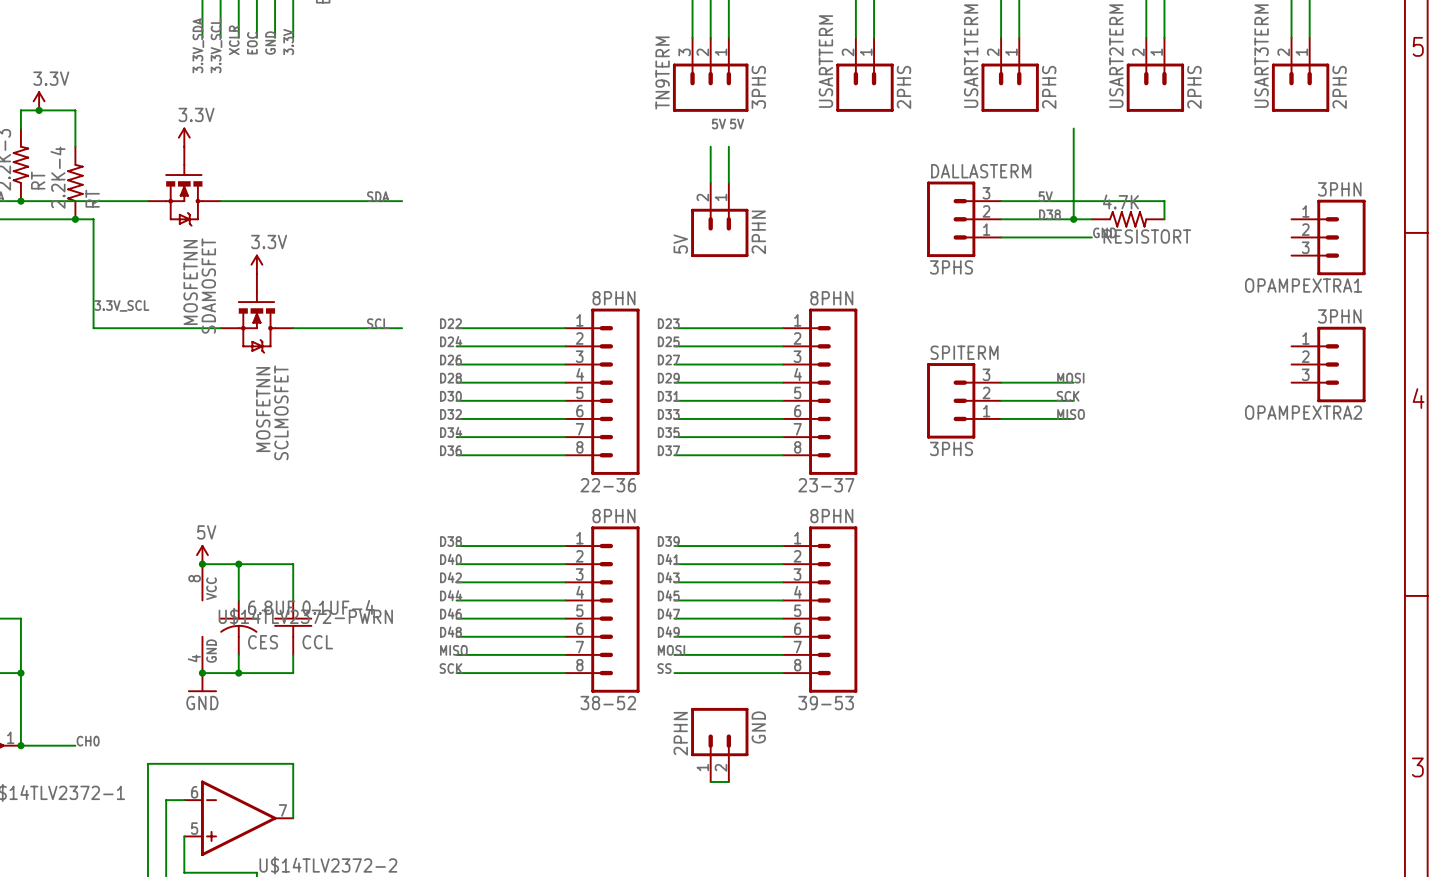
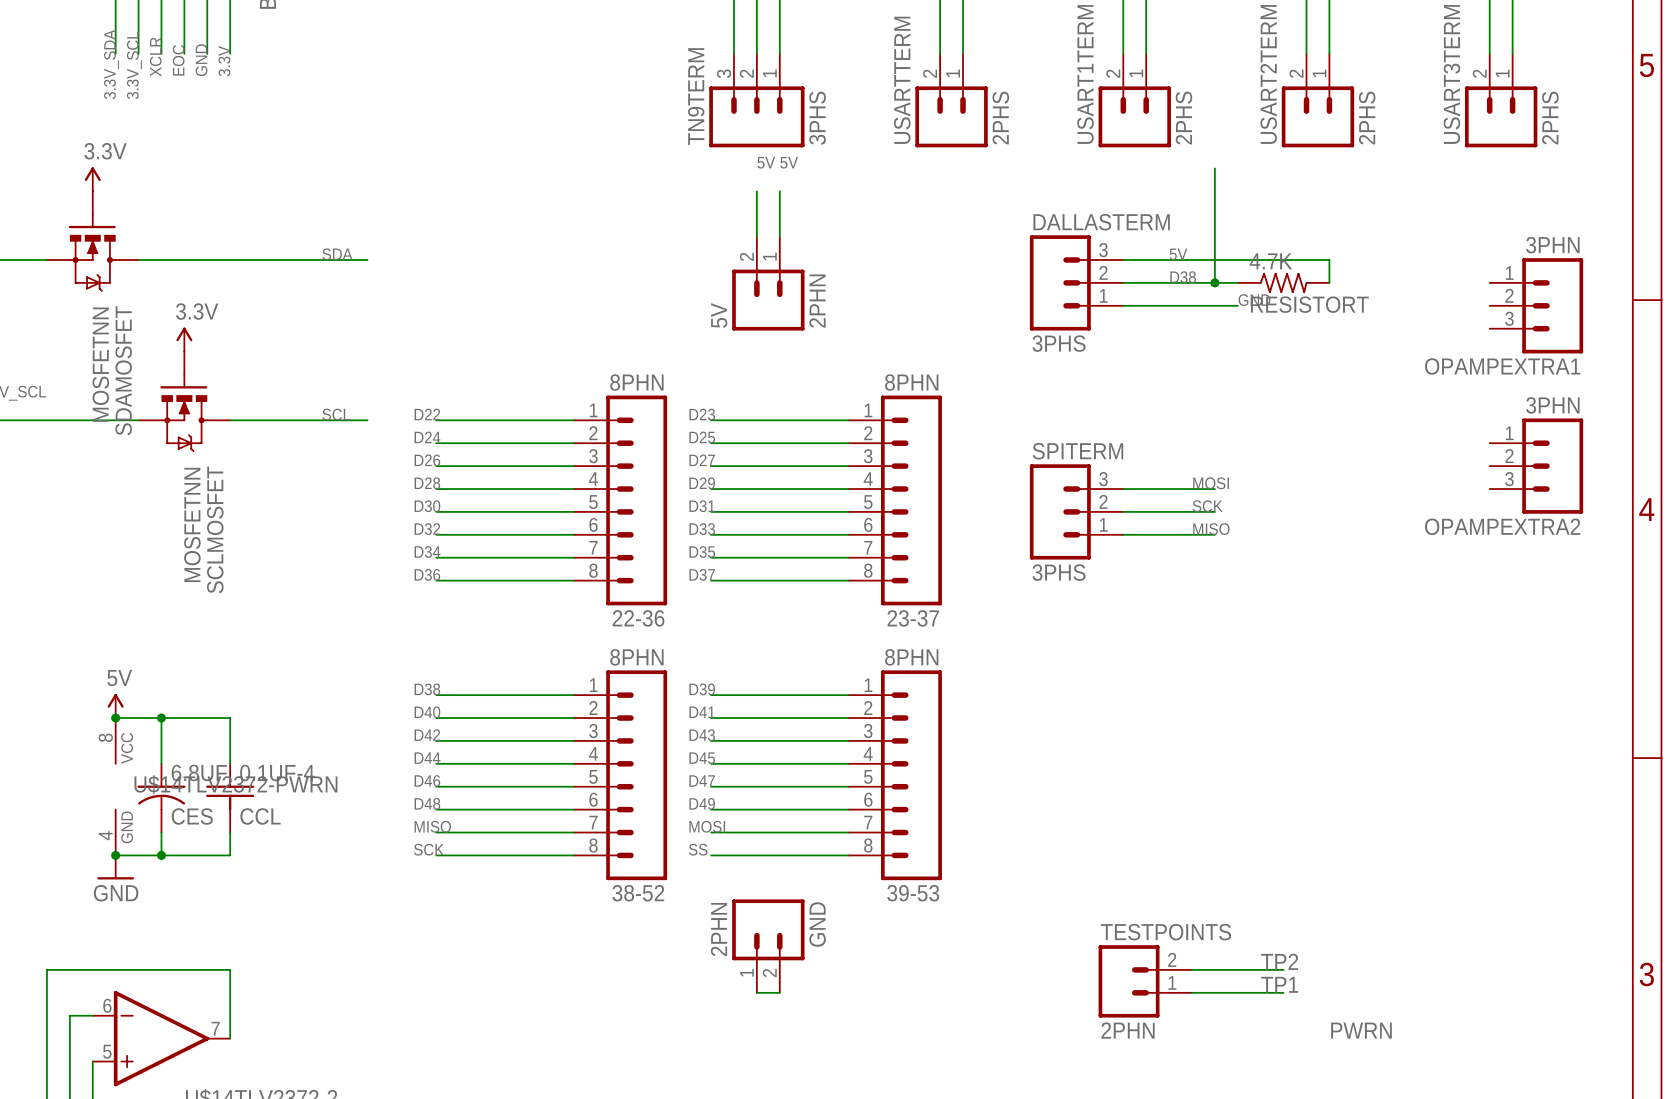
label: none -> TP2 (1279, 961)
wire: none -> (1192, 969) (1283, 969)
TESTPOINTS: none -> 2PHN (1145, 981)
label: none -> TP1 (1279, 984)
wire: none -> (1192, 992) (1283, 992)
label: none -> PWRN (1361, 1030)

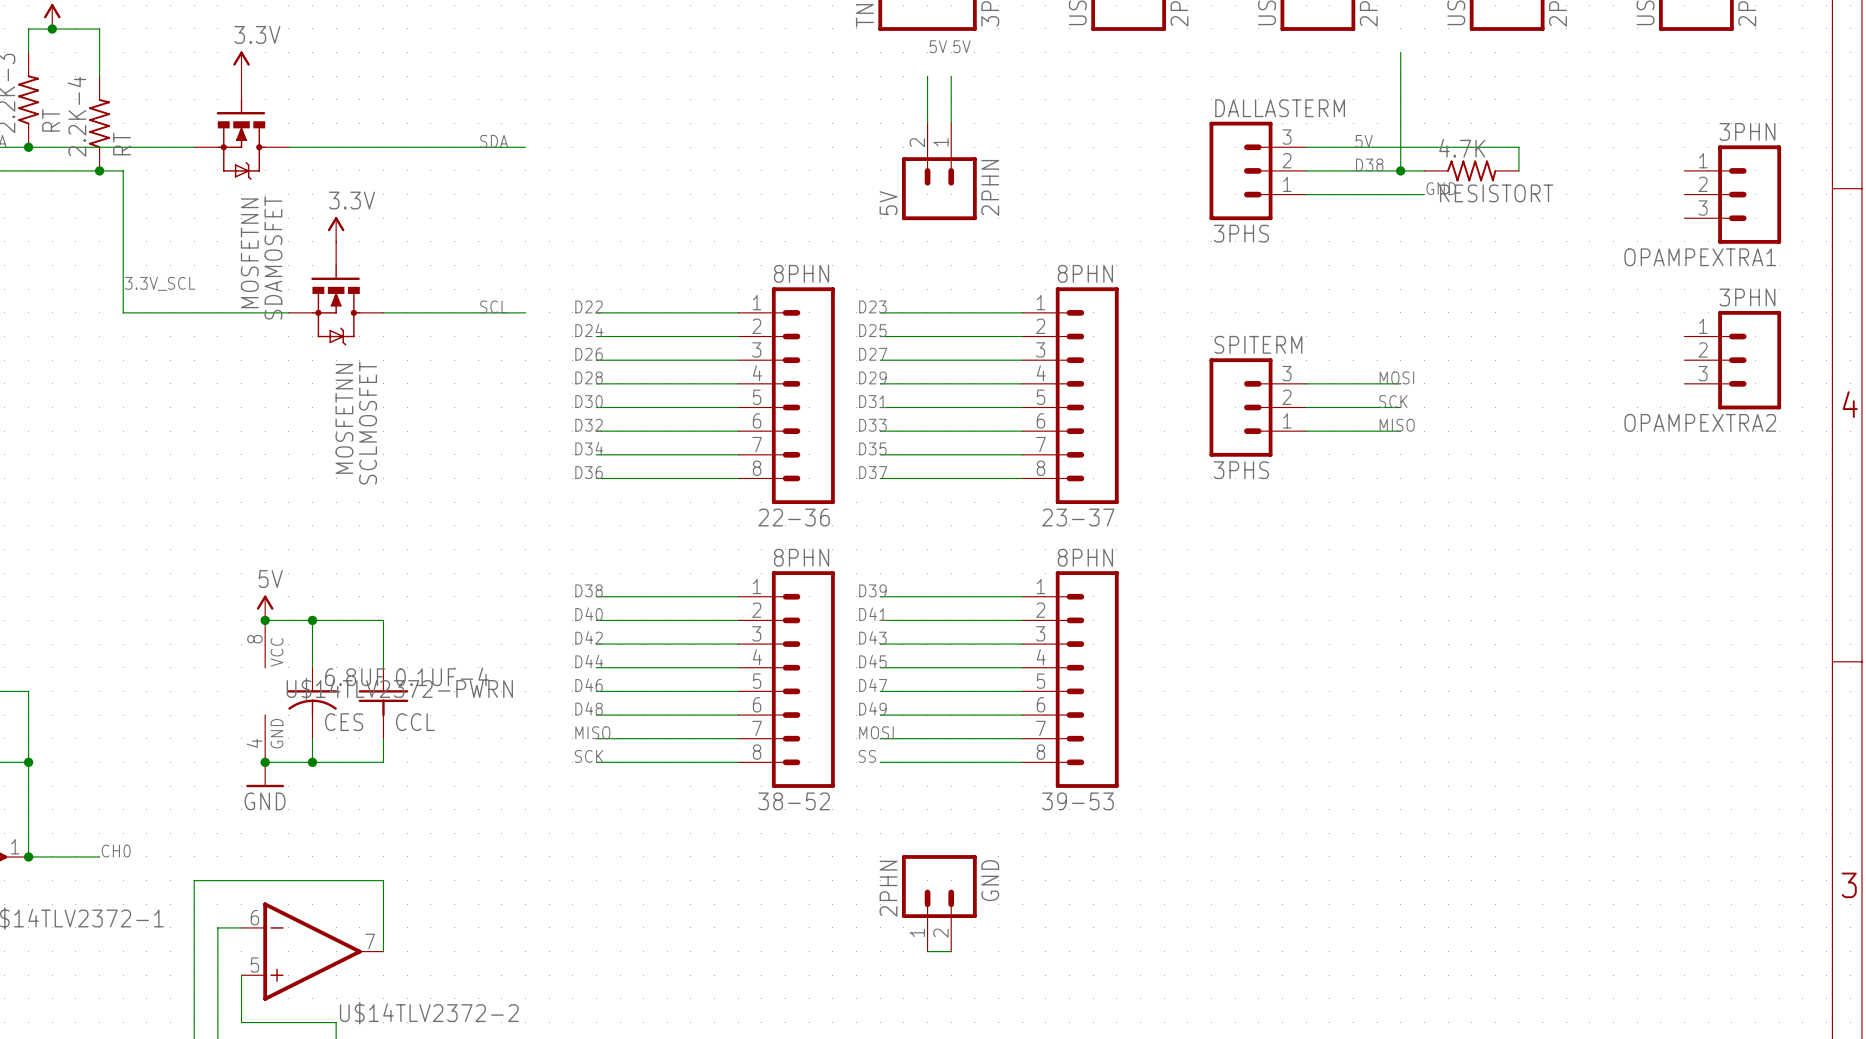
GND position: (768, 946) -> (939, 903)
label: TP2 (1279, 961) -> none
wire: (1192, 969) (1283, 969) -> none
TESTPOINTS: 2PHN (1145, 981) -> none
label: TP1 (1279, 984) -> none
wire: (756, 992) (779, 992) -> (927, 951) (951, 951)
wire: (1192, 992) (1283, 992) -> none
label: PWRN (1361, 1030) -> none

